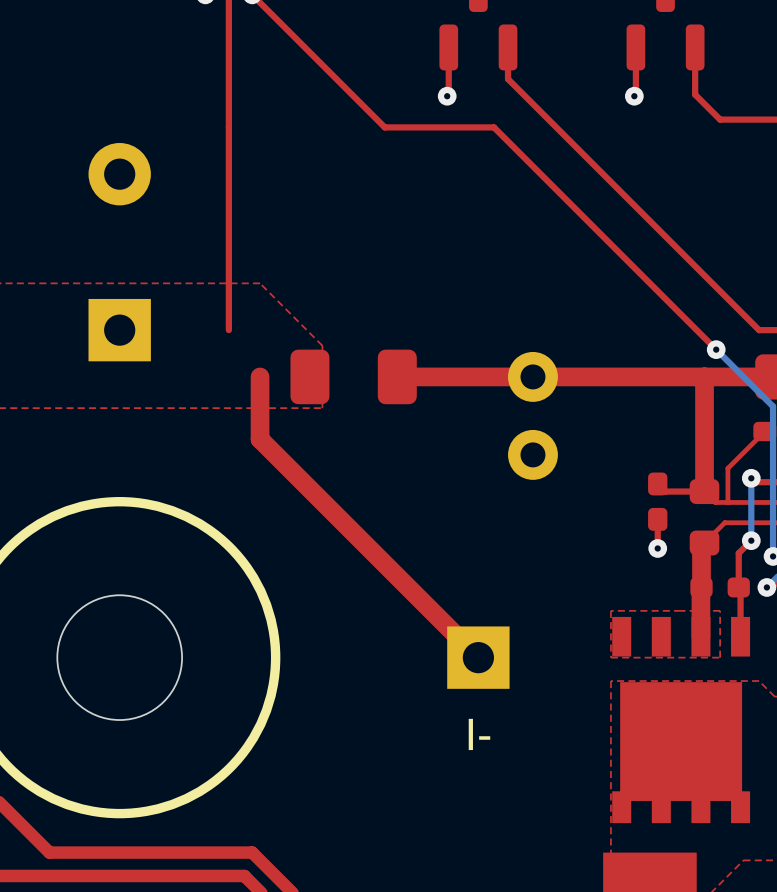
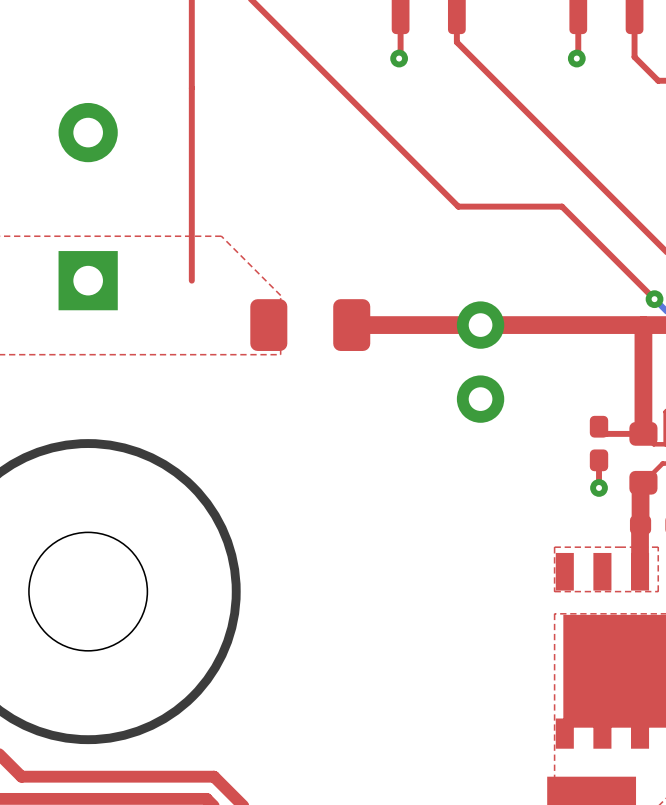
top track: (384, 127) (493, 127) (618, 252) -> (339, 88) (458, 206) (561, 206)
top track: (260, 376) (260, 439) (478, 657) -> none
part: (478, 657) -> none
text: I- (479, 734) -> none

